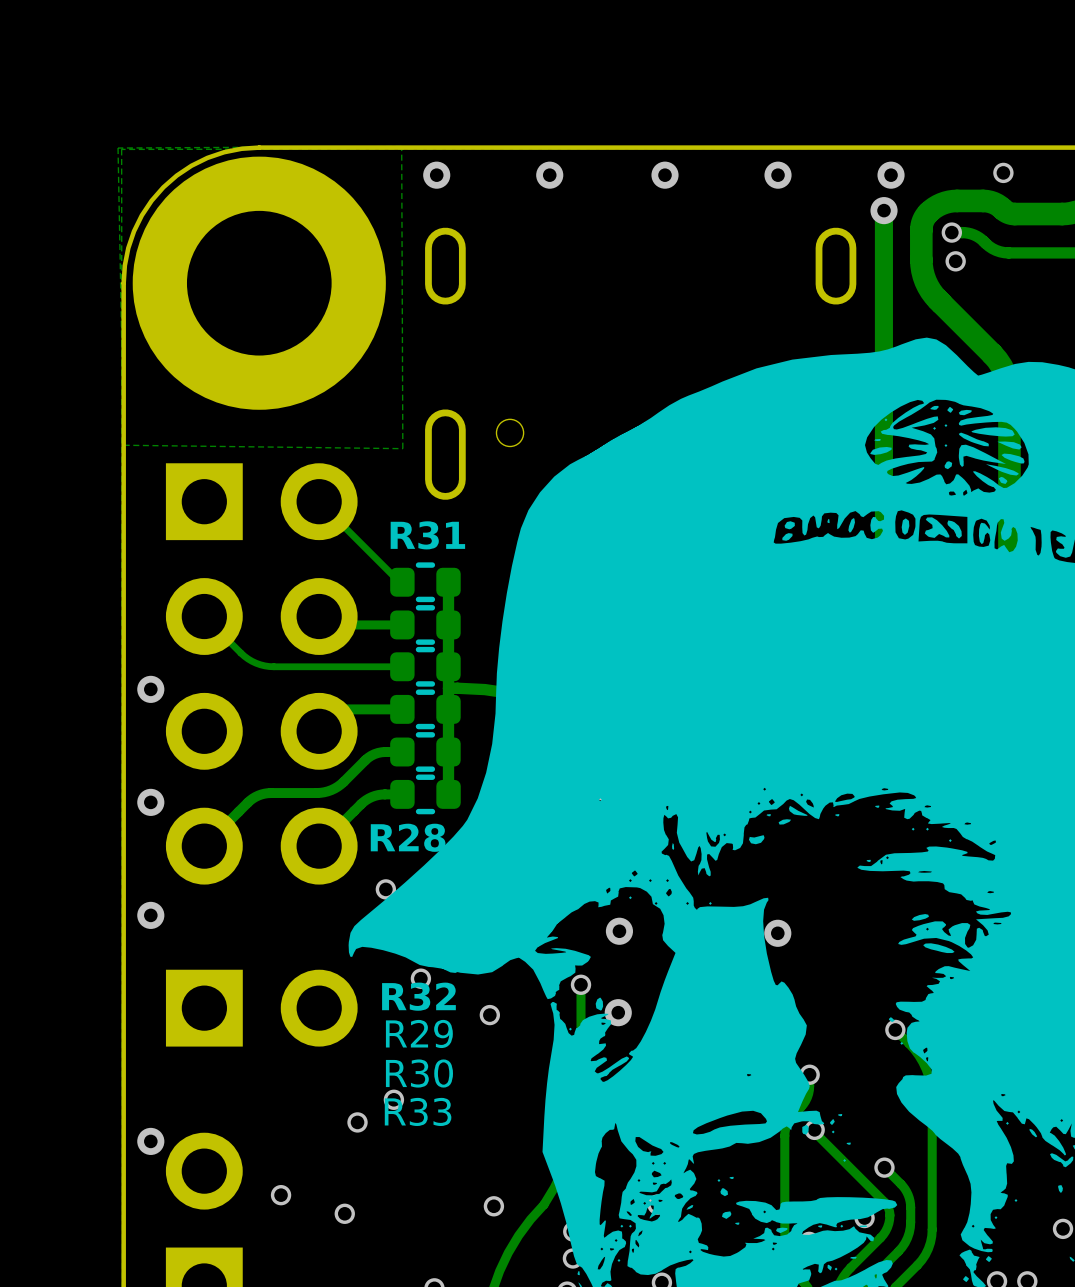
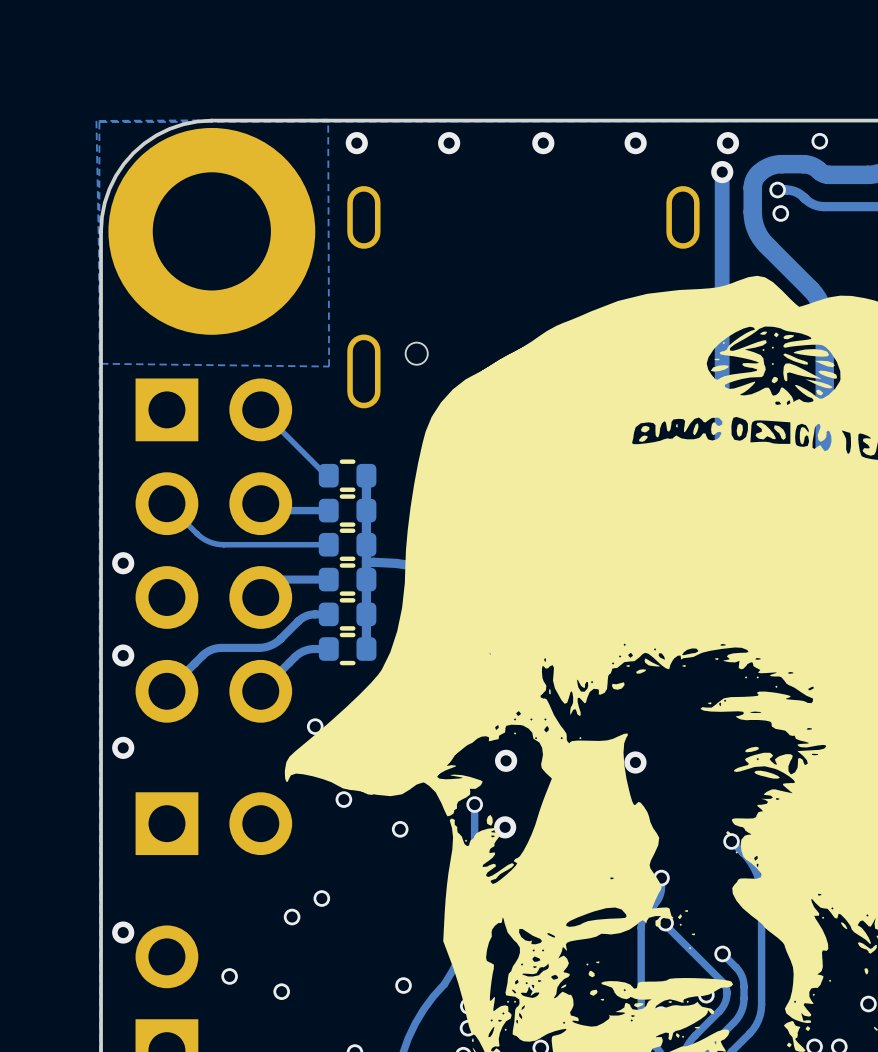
R31 name: R31 (427, 535) -> none
R28 name: R28 (408, 837) -> none
R32 name: R32 (418, 996) -> none
R29 name: R29 (419, 1033) -> none
R30 name: R30 (419, 1073) -> none
R33 name: R33 (418, 1111) -> none

